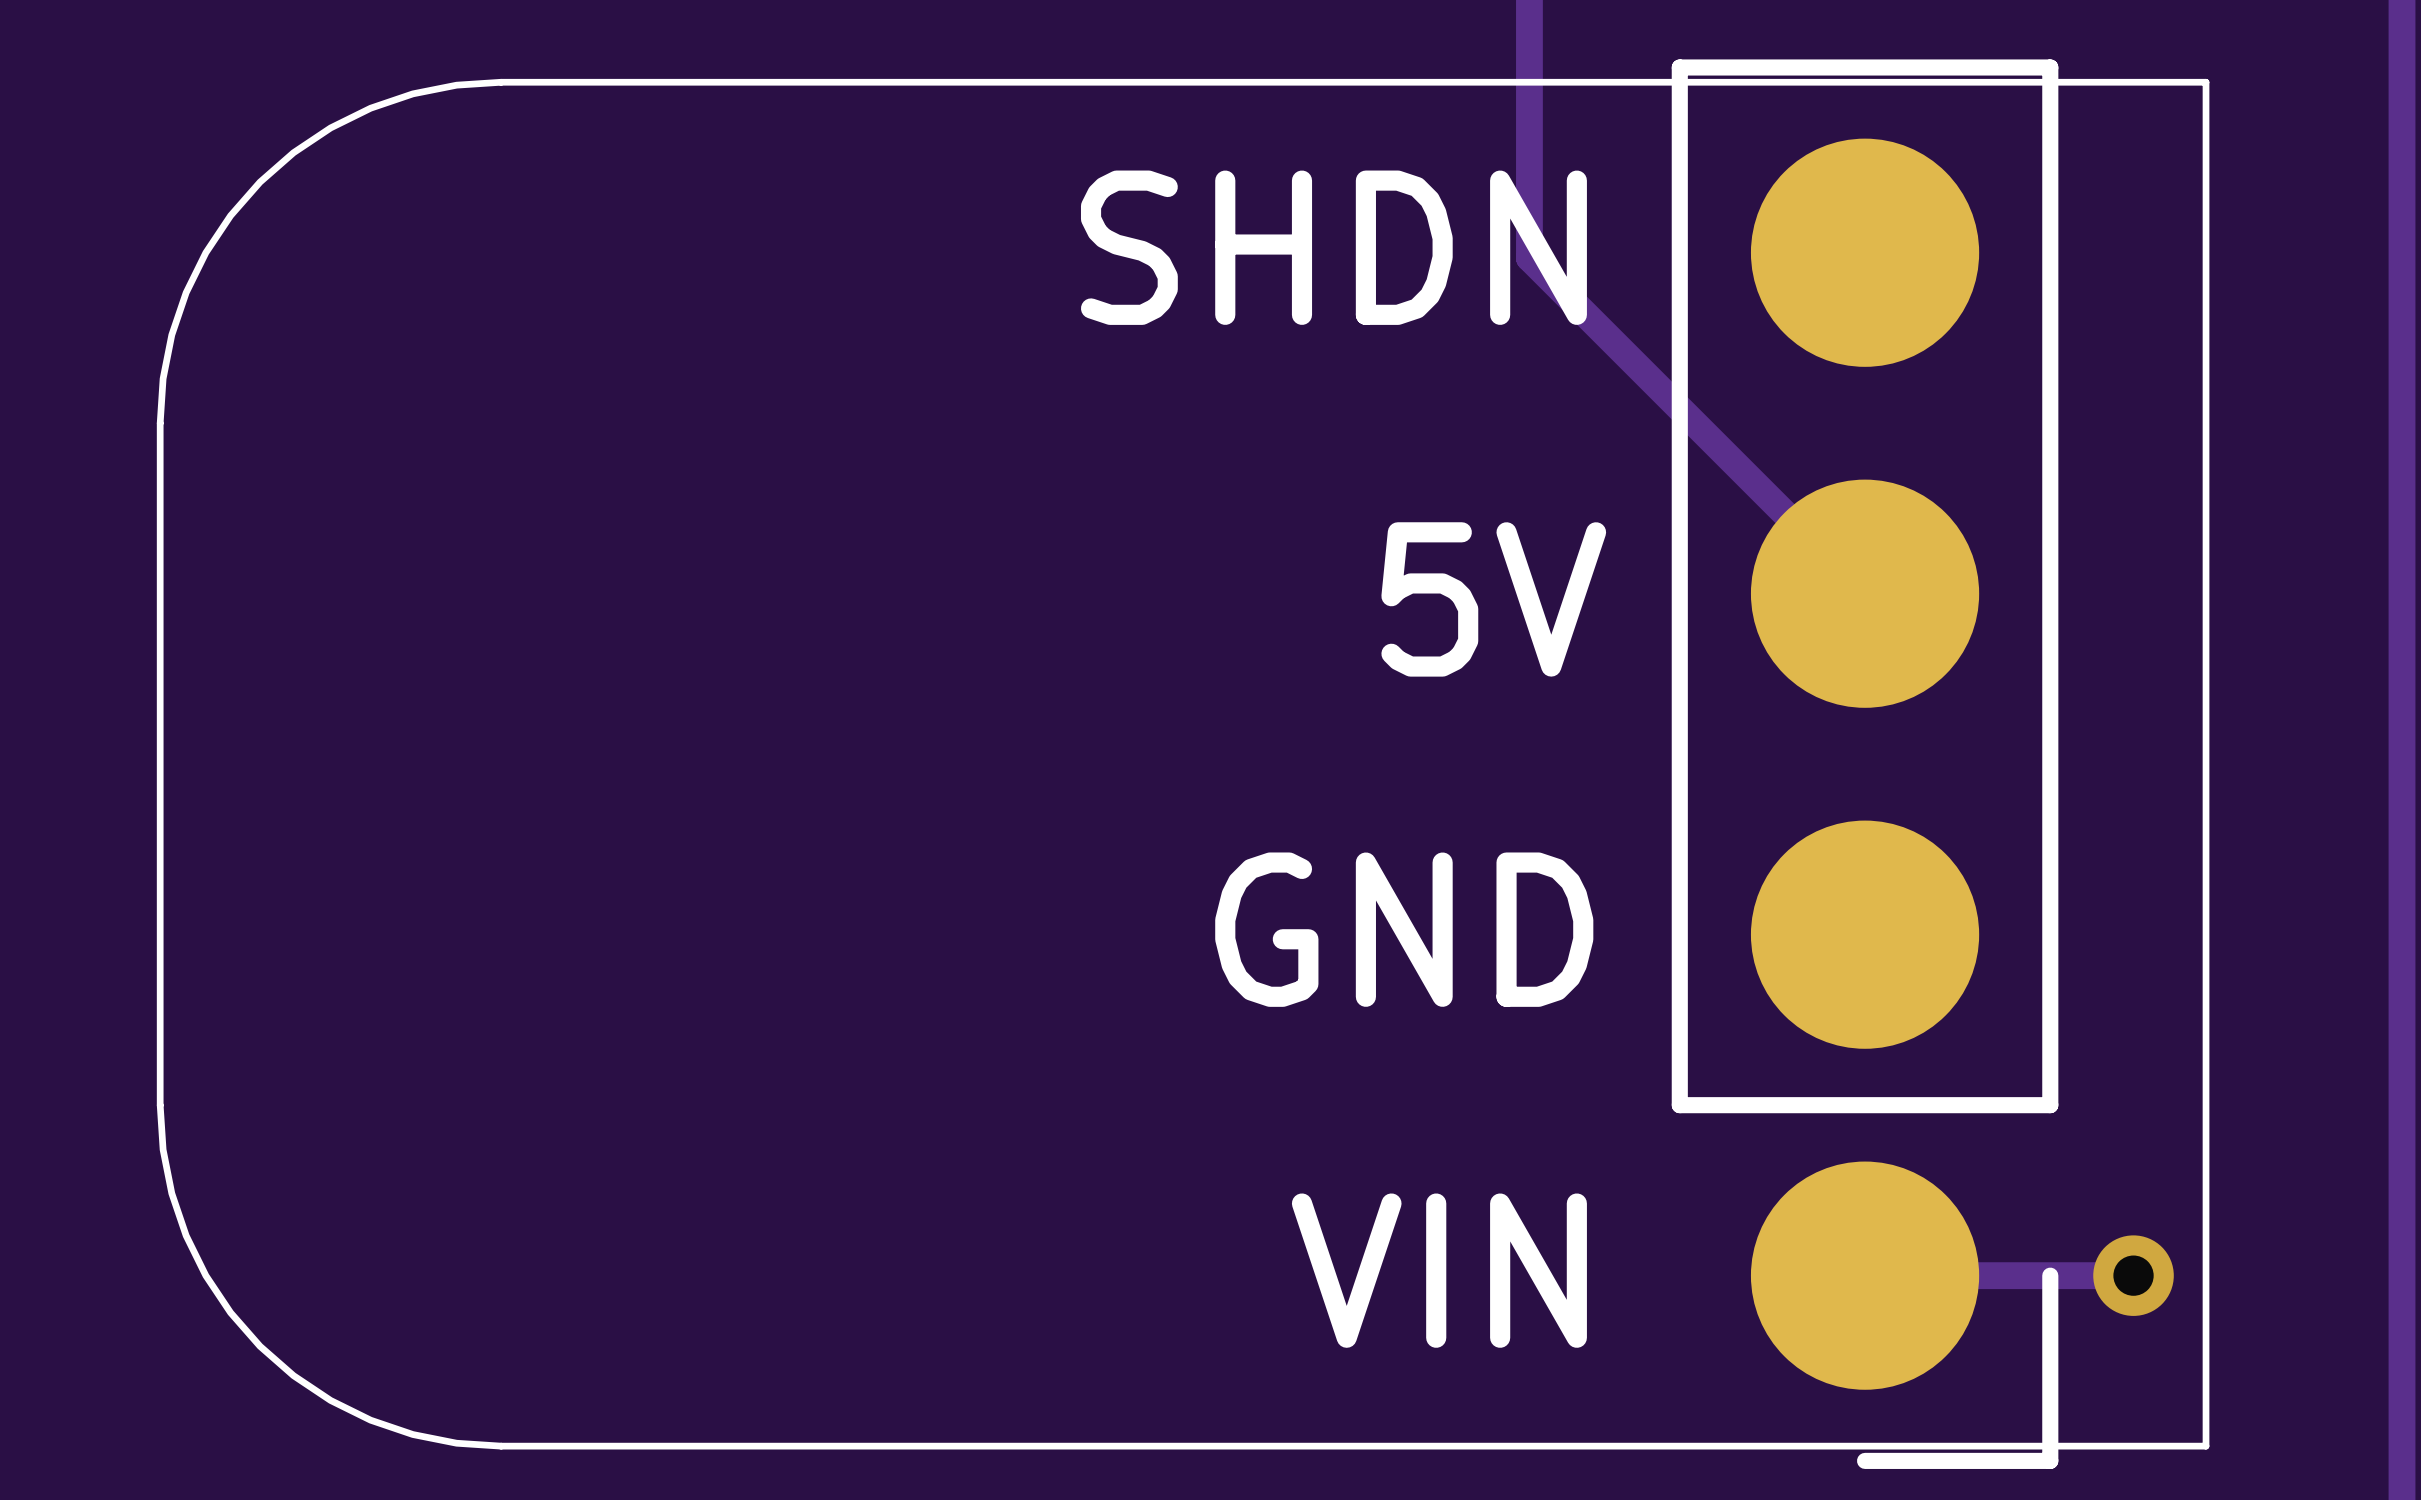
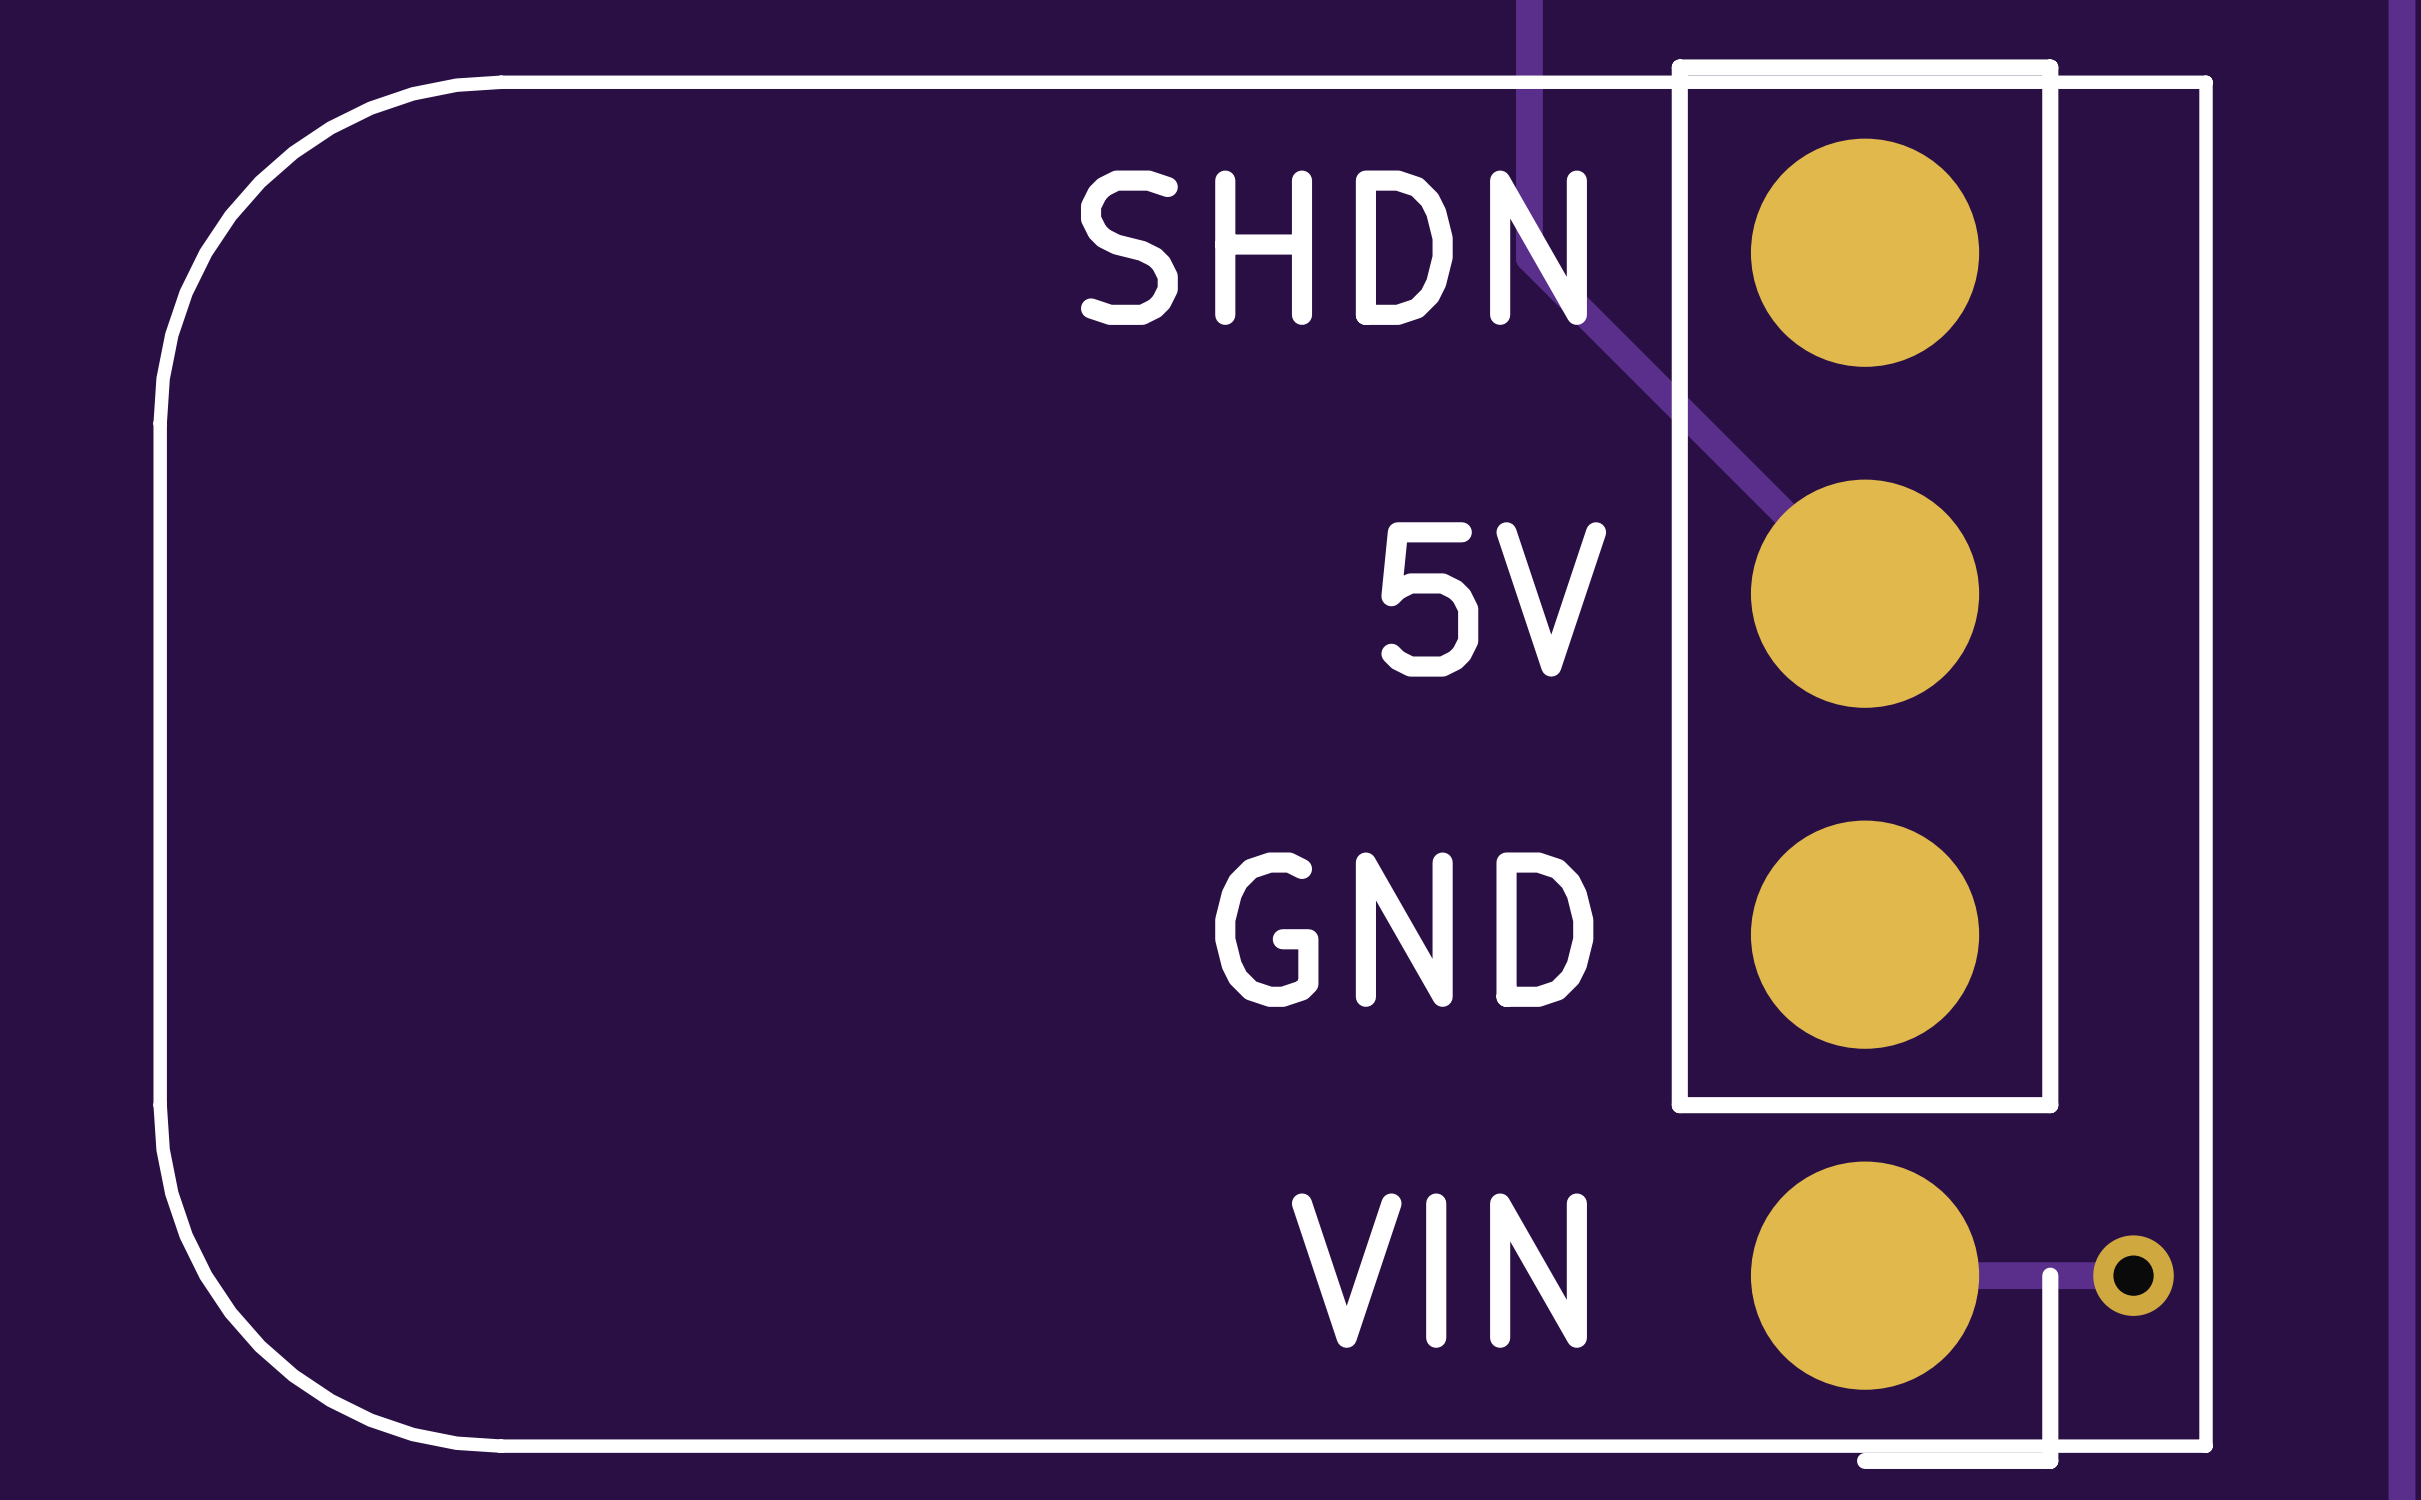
line width: thin (501, 82) (2206, 82) (2206, 1446) (501, 1446) (456, 1443) (412, 1434) (370, 1420) (330, 1400) (293, 1375) (260, 1346) (230, 1312) (205, 1275) (186, 1235) (171, 1193) (163, 1149) (160, 1105) (160, 423) (163, 378) (171, 334) (186, 292) (205, 252) (230, 215) (260, 182) (293, 152) (330, 127) (370, 108) (412, 93) (456, 85) (501, 82) -> thick (501, 82) (2206, 82) (2206, 1446) (501, 1446) (456, 1443) (412, 1434) (370, 1420) (330, 1400) (293, 1375) (260, 1346) (230, 1312) (205, 1275) (186, 1235) (171, 1193) (163, 1149) (160, 1105) (160, 423) (163, 378) (171, 334) (186, 292) (205, 252) (230, 215) (260, 182) (293, 152) (330, 127) (370, 108) (412, 93) (456, 85) (501, 82)

